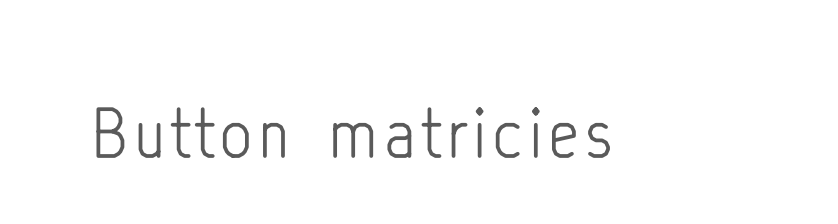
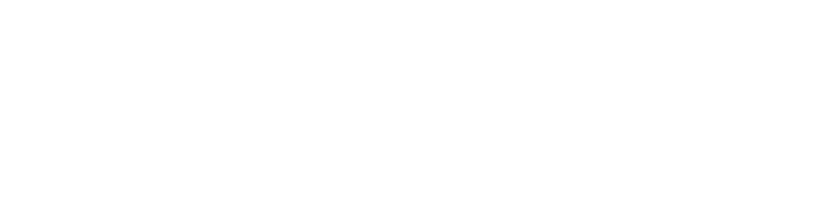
text: Button matricies (353, 132) -> none

